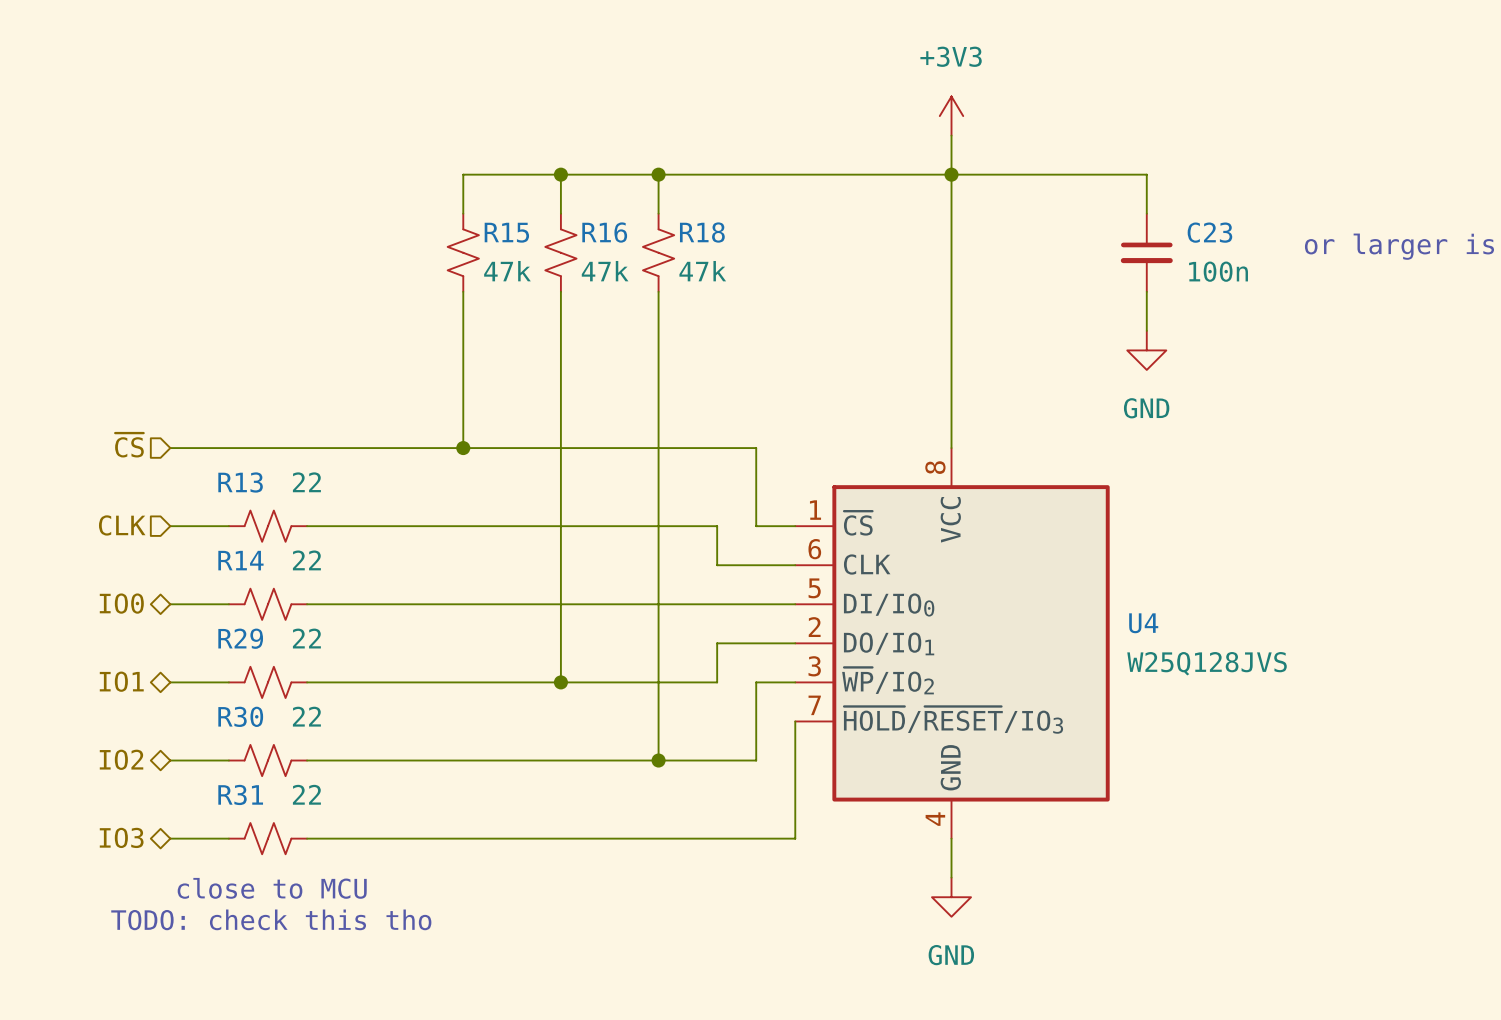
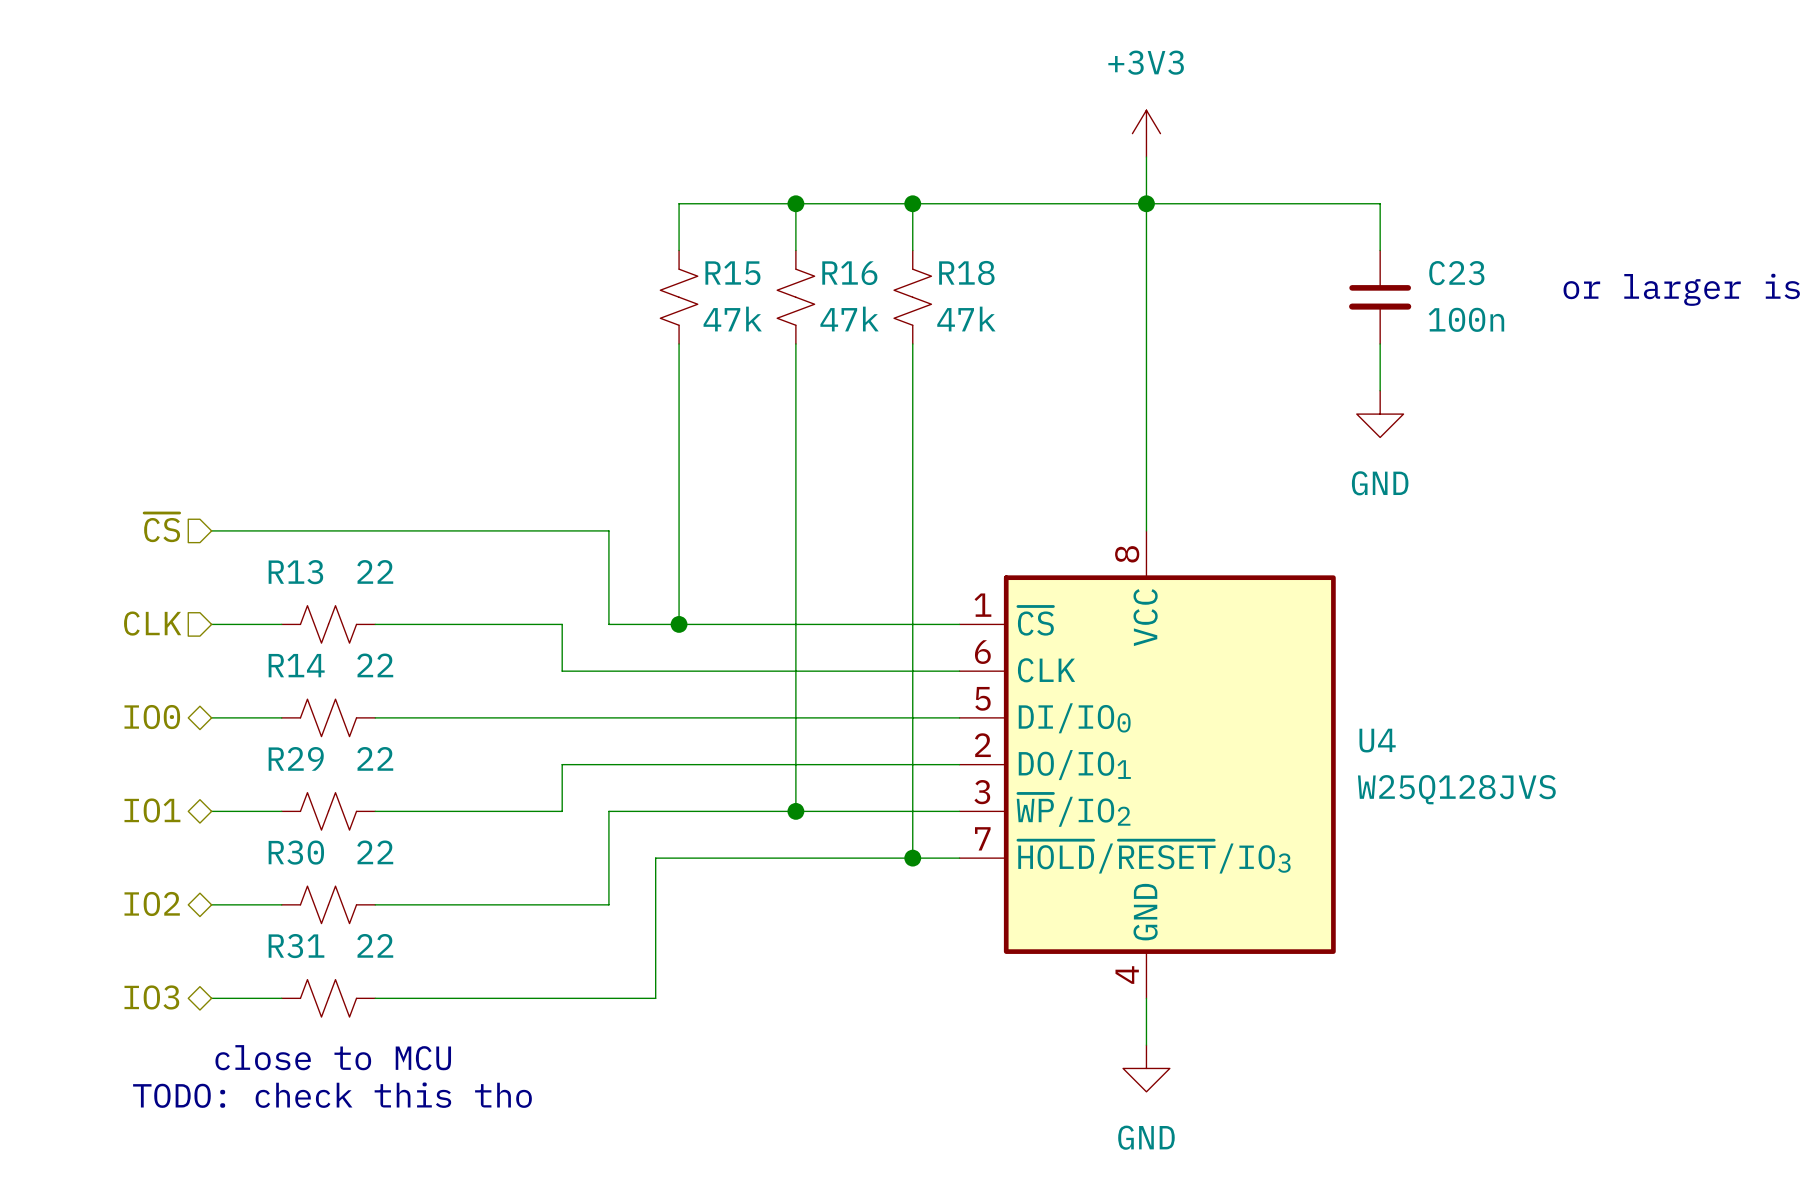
wire: (560, 174) (463, 174) (463, 213) -> none
junction: (560, 174) -> none
wire: none -> (912, 203) (912, 250)
junction: none -> (912, 203)
R16 name: R16 (604, 232) -> R15 (732, 273)
R18 name: R18 (702, 232) -> R16 (849, 273)
R15: 47k (463, 252) -> none
R18: none -> 47k (912, 297)
wire: (463, 291) (463, 448) -> none
junction: (463, 448) -> none
wire: (502, 448) (756, 448) -> (912, 343) (912, 530)
wire: (463, 526) (502, 526) -> (608, 530) (608, 624)
wire: none -> (562, 624) (562, 671) (866, 671)
wire: (560, 526) (560, 682) -> none
junction: none -> (679, 624)
wire: (717, 526) (717, 565) -> (866, 624) (912, 624) (912, 811) (866, 811)
wire: (717, 643) (717, 682) -> (866, 764) (562, 764) (562, 811)
wire: (463, 682) (502, 682) -> (608, 904) (608, 811)
junction: (560, 682) -> none
wire: (658, 682) (658, 760) -> none
junction: none -> (795, 811)
wire: (756, 721) (756, 760) (502, 760) -> none
junction: none -> (912, 858)
wire: (795, 721) (795, 838) (541, 838) -> (959, 858) (655, 858) (655, 998)
junction: (658, 760) -> none

